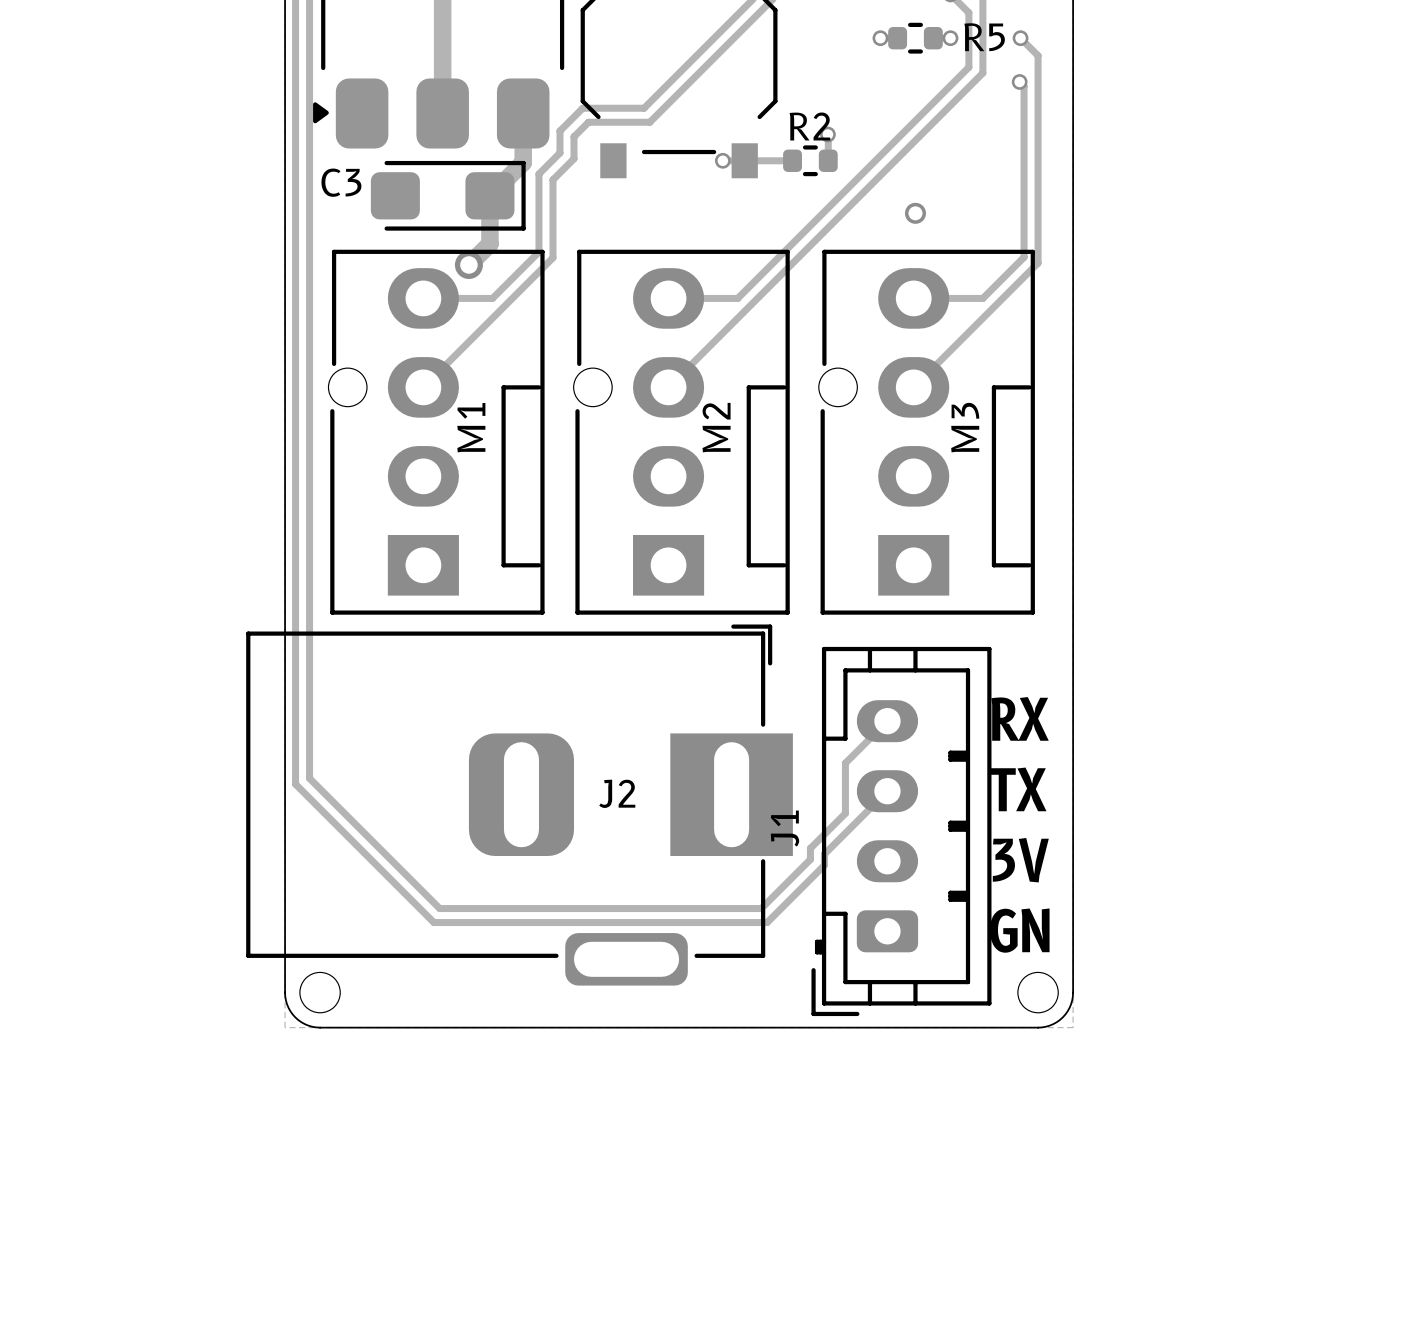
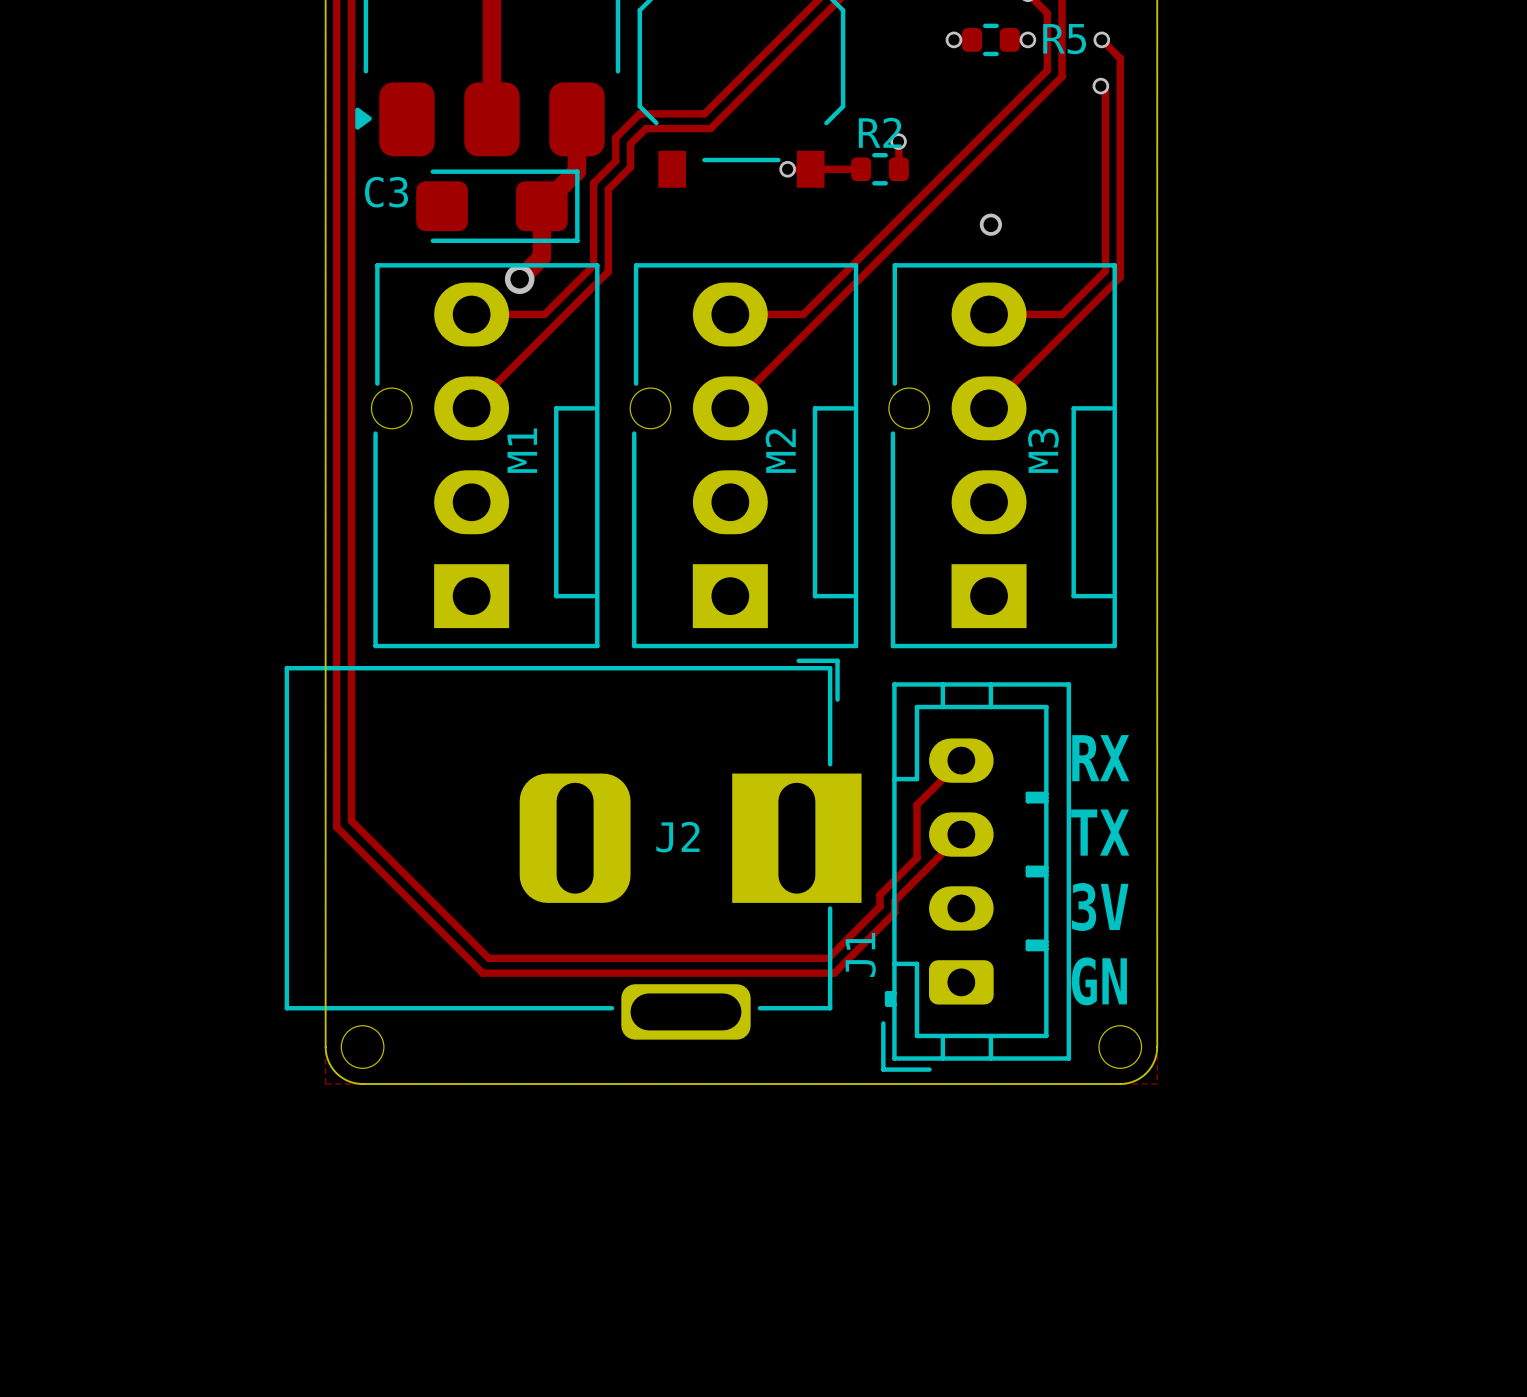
J1 name position: J1 (785, 828) -> J1 (860, 954)

